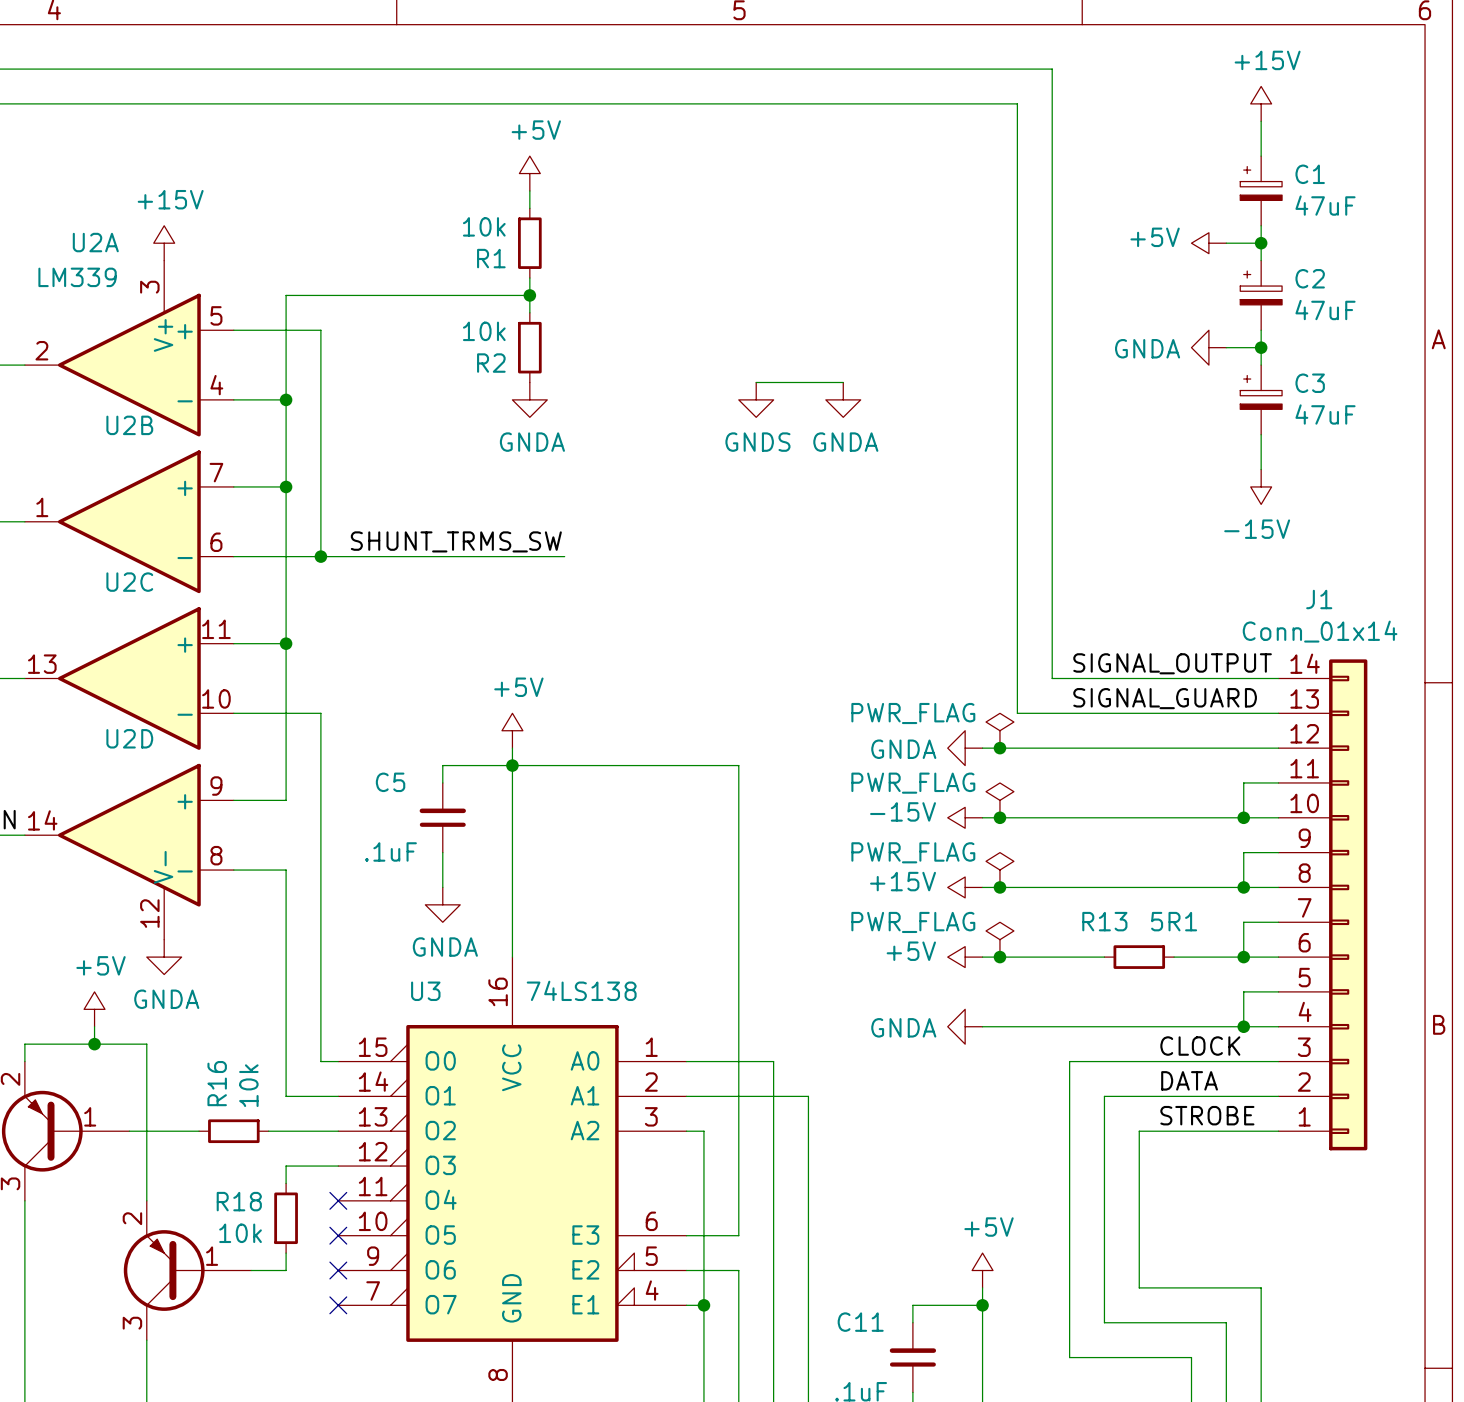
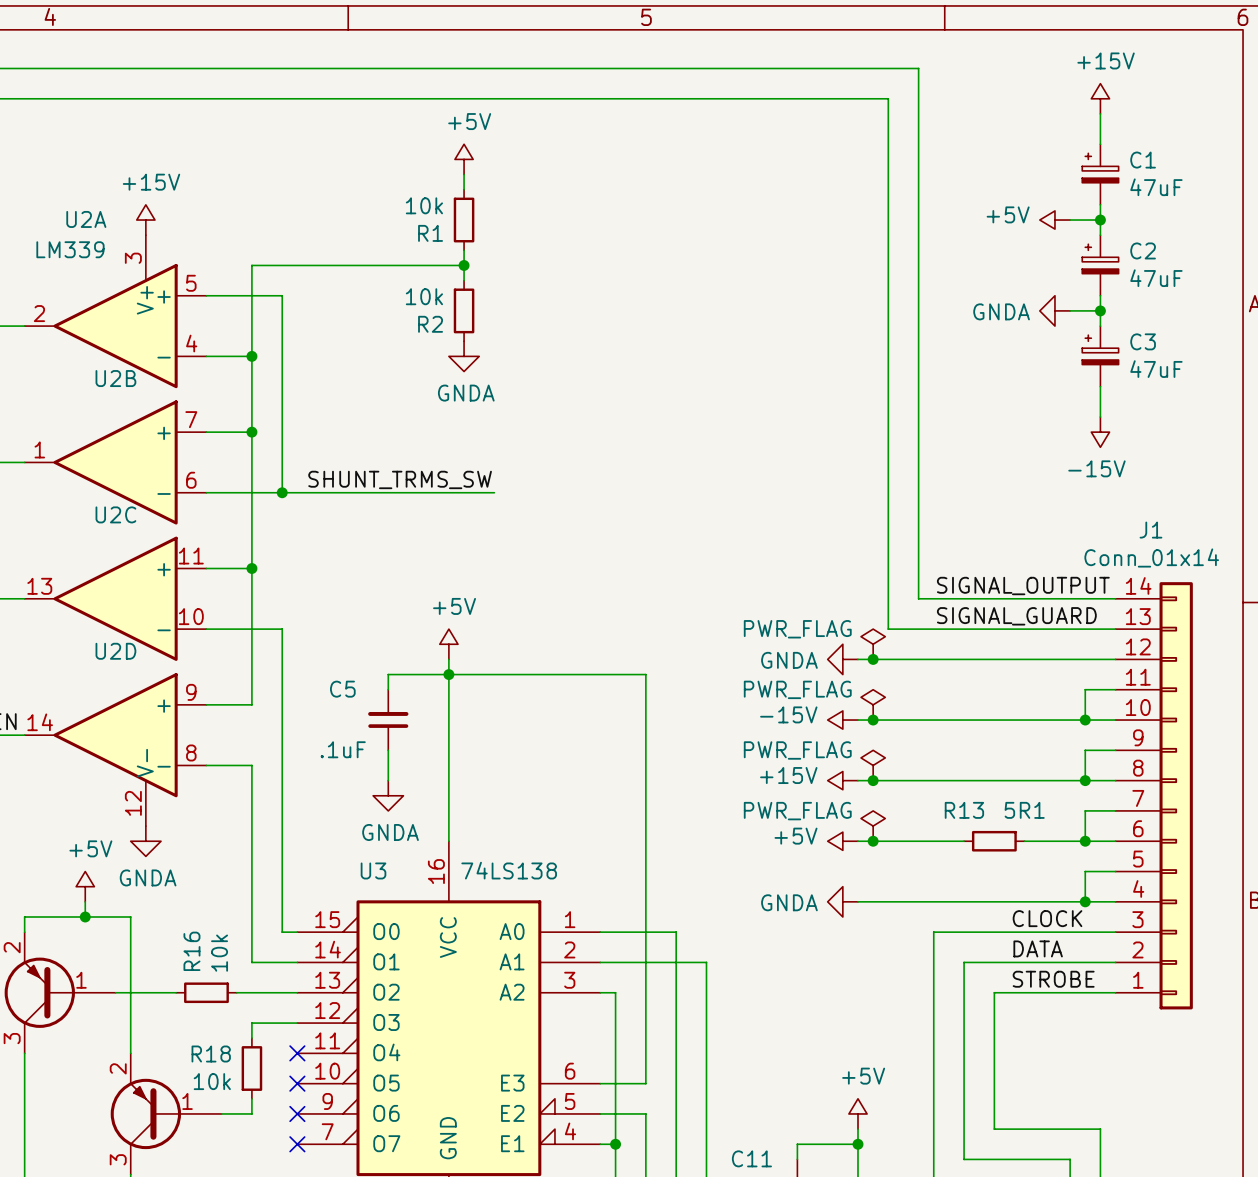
wire: (756, 382) (843, 382) -> none
power symbol: GNDS (756, 399) -> none
power symbol: GNDA (843, 399) -> none

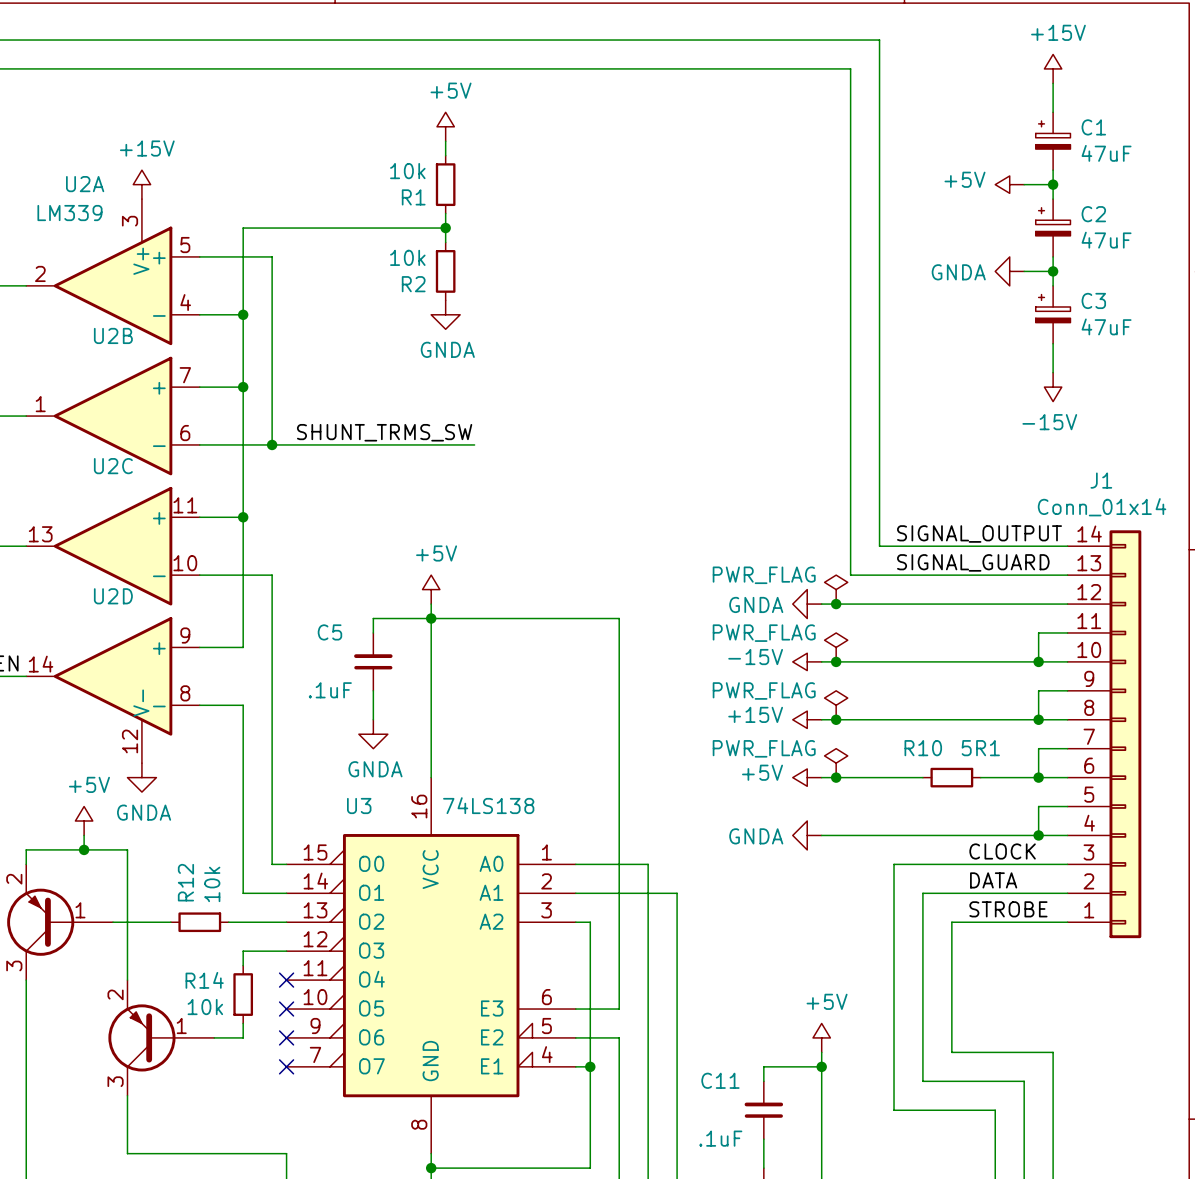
R13 name: R13 (964, 810) -> R10 (923, 748)
R16 name: R16 (191, 951) -> R12 (185, 882)
R18 name: R18 (211, 1054) -> R14 (204, 980)

